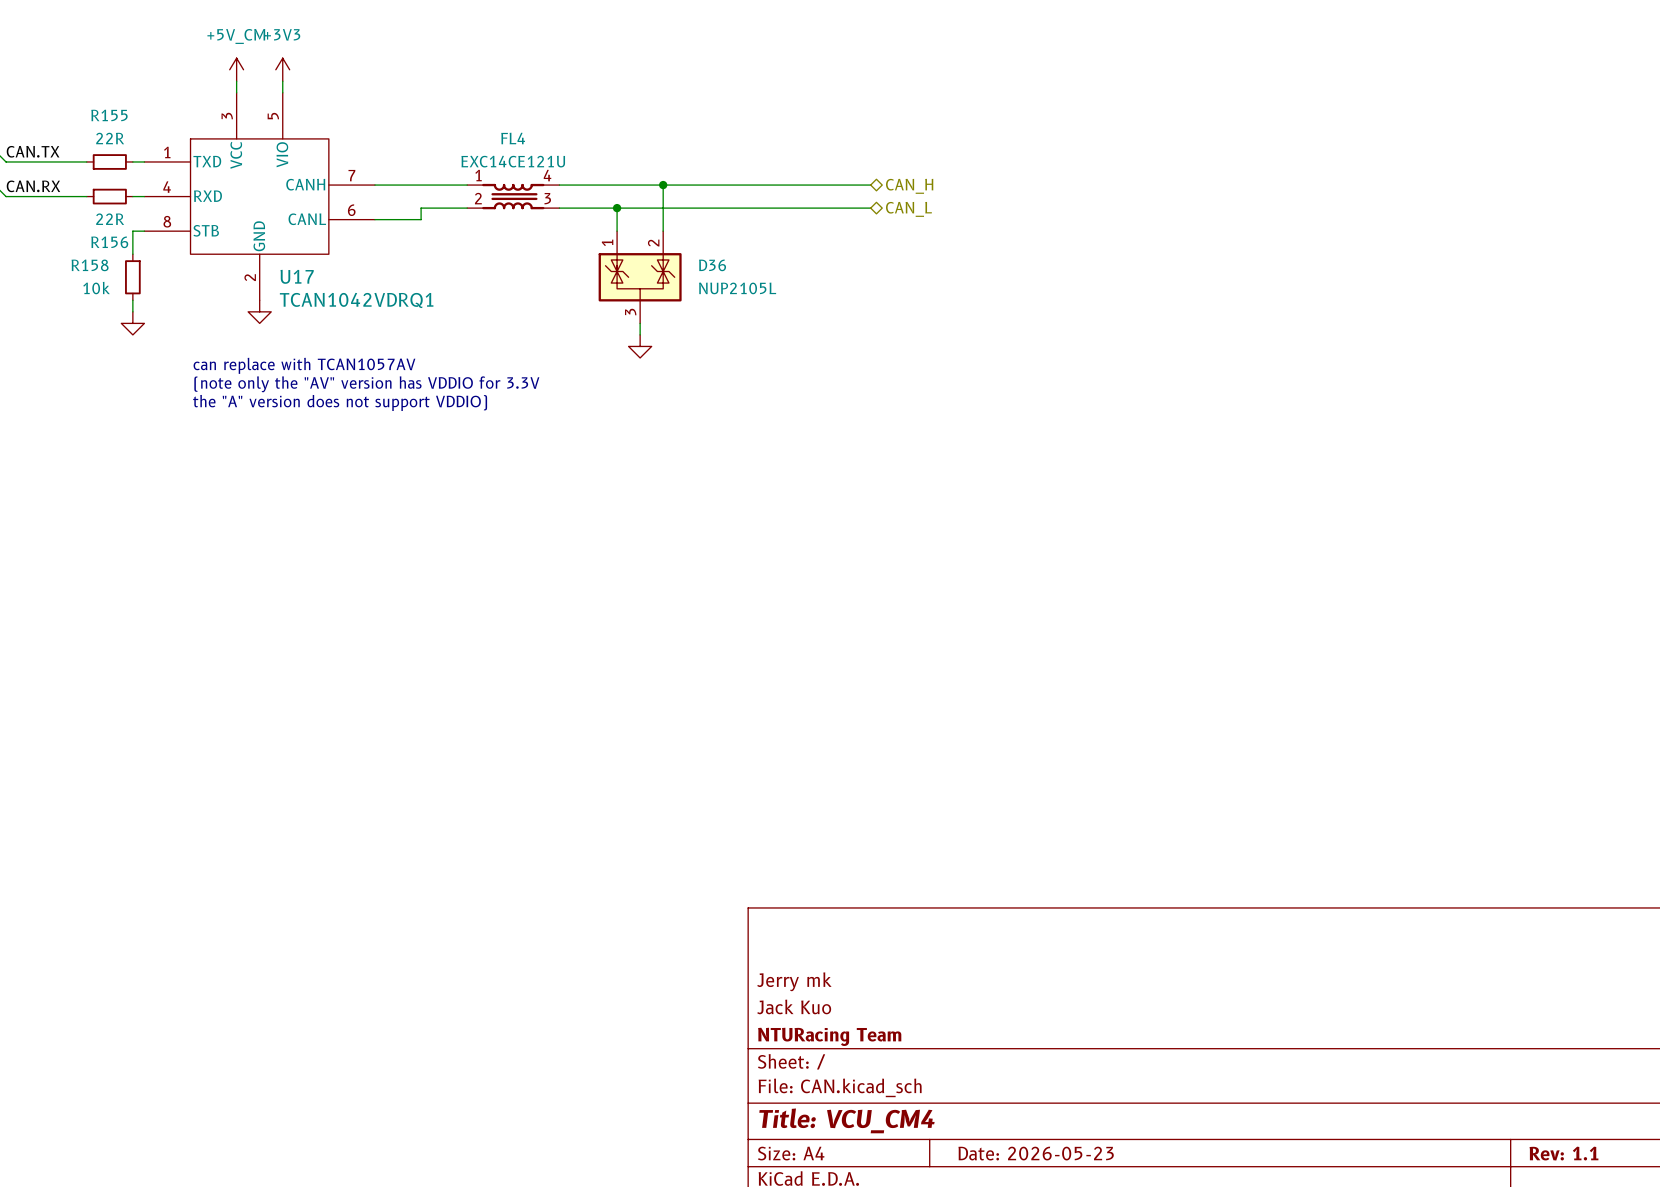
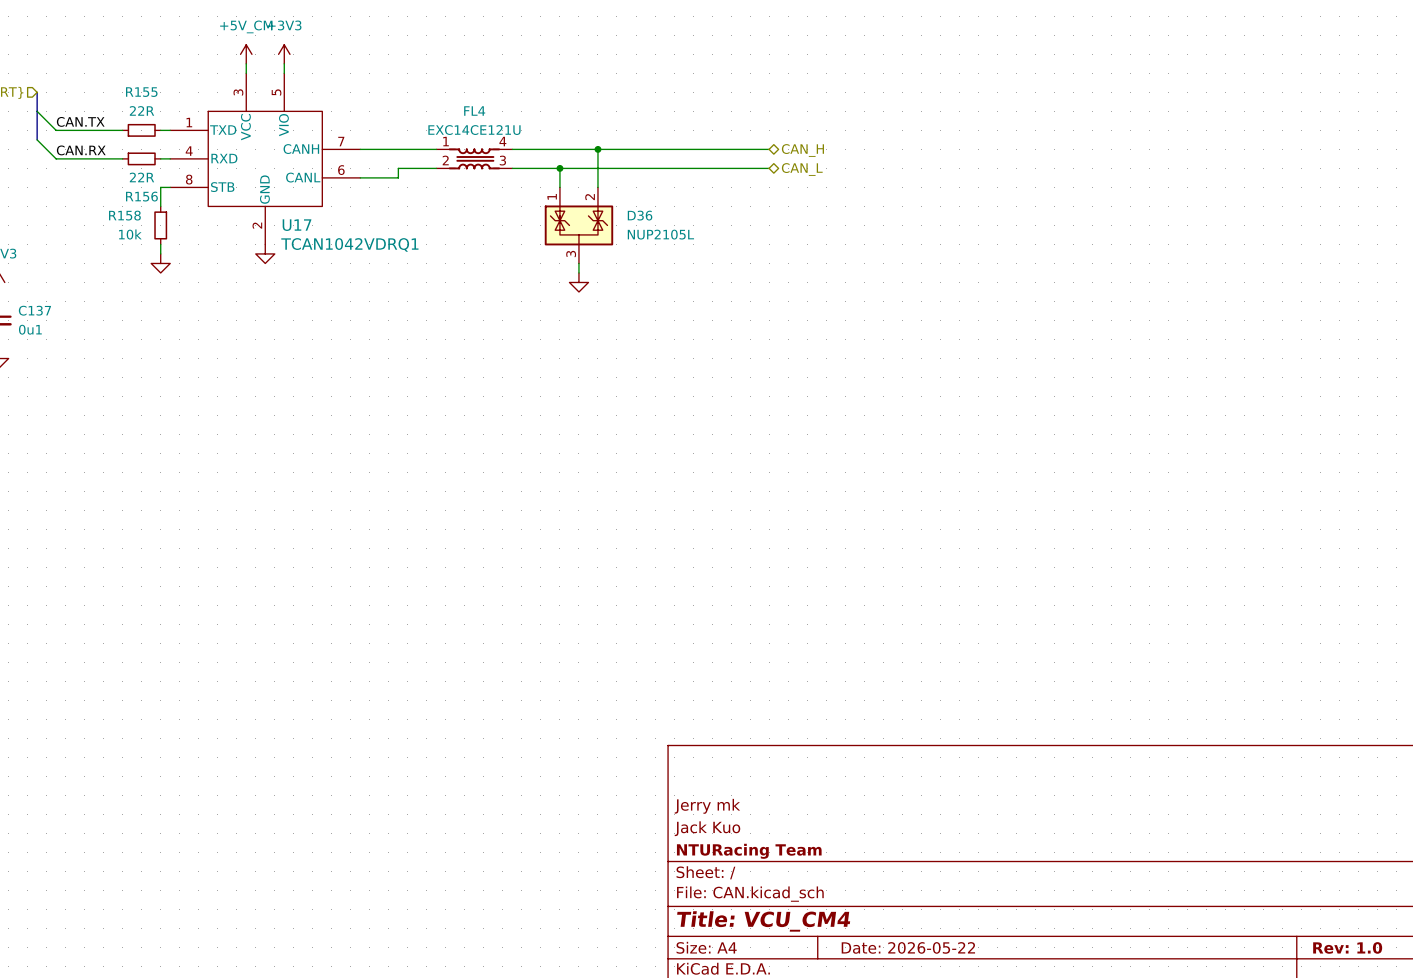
text: can replace with TCAN1057AV (304, 365) -> none
text: (note only the "AV" version has VDDIO for 3.3V (366, 384) -> none
text: the "A" version does not support VDDIO) (340, 402) -> none
title block: Date: 2026-05-23 (1036, 1153) -> Date: 2026-05-22 (908, 947)
title block: Rev: 1.1 (1563, 1153) -> Rev: 1.0 (1347, 947)

